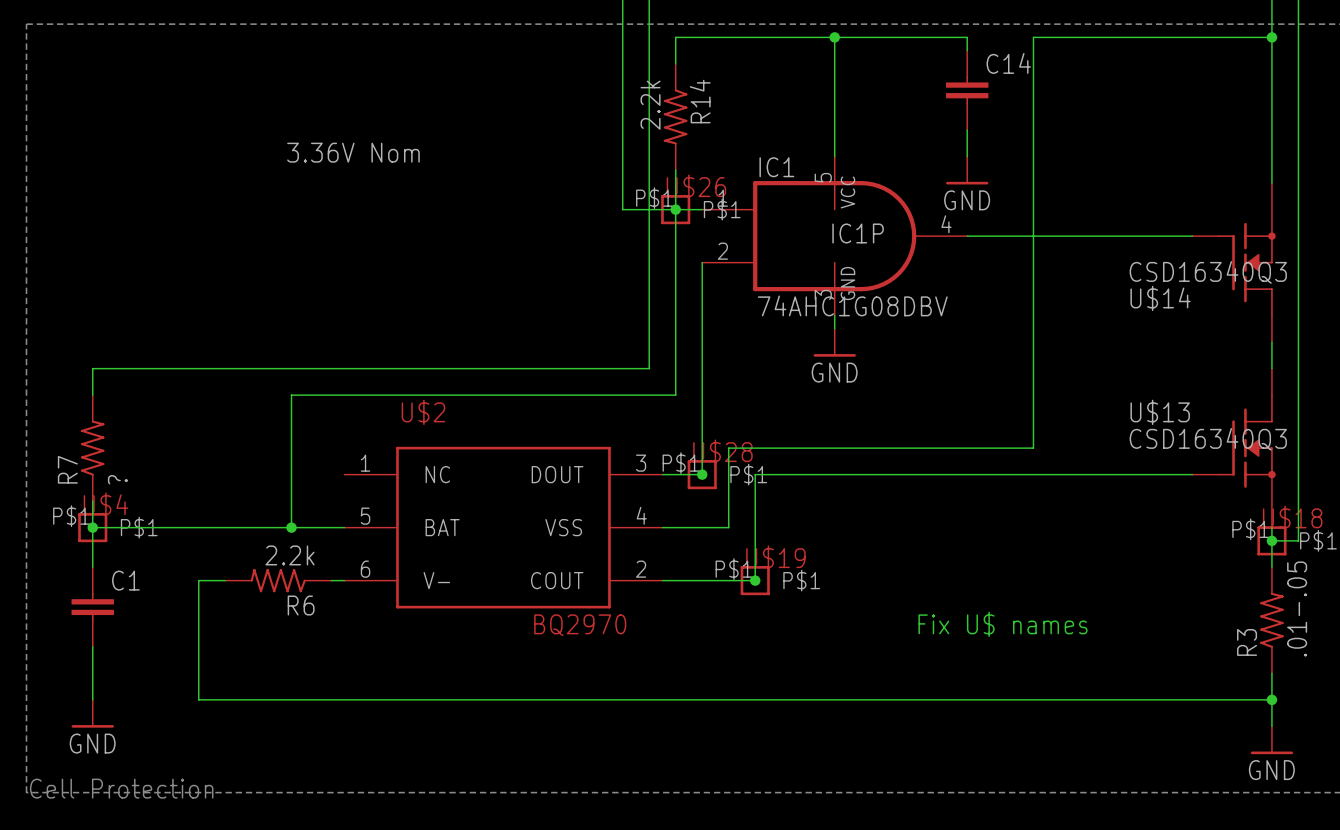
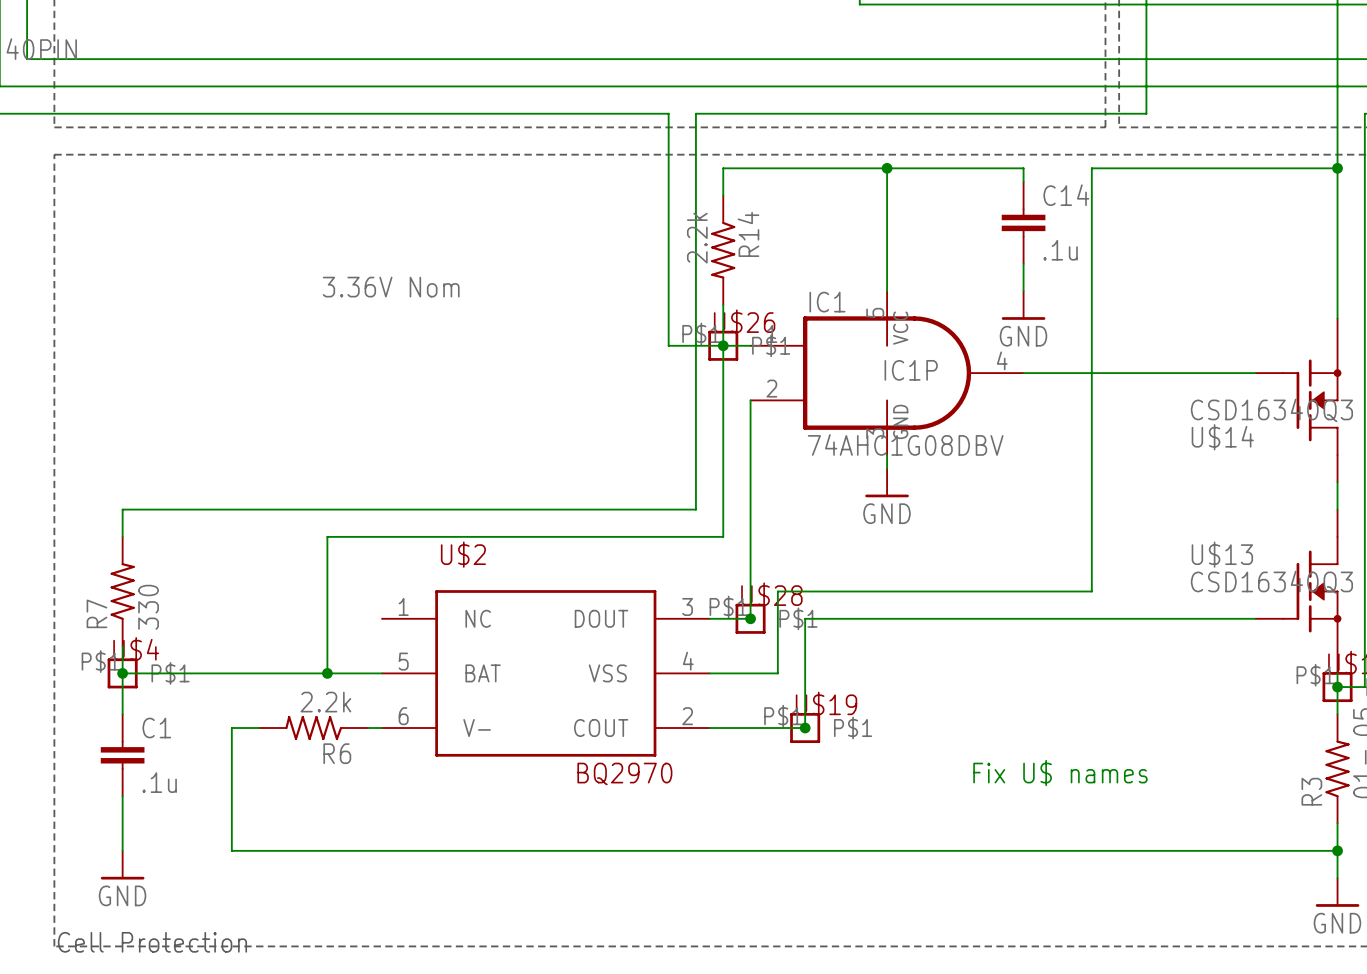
C14 value: none -> .1u (1060, 250)
R7 value: ? (117, 479) -> 330 (148, 607)
C1 value: none -> .1u (159, 782)

